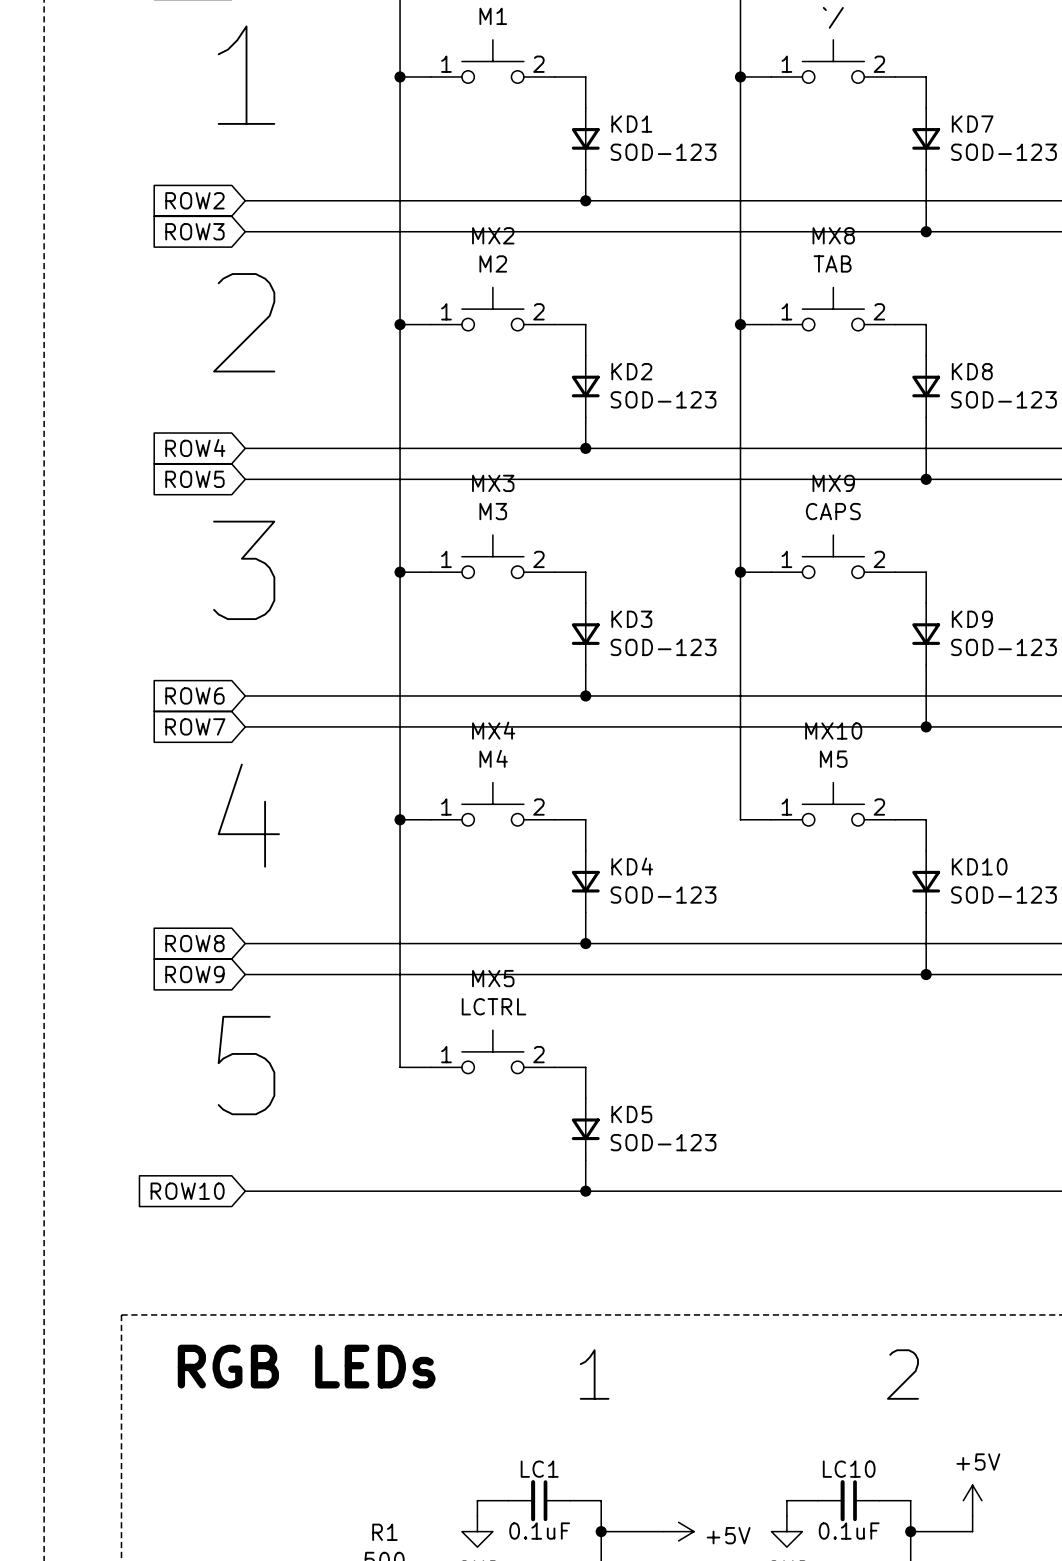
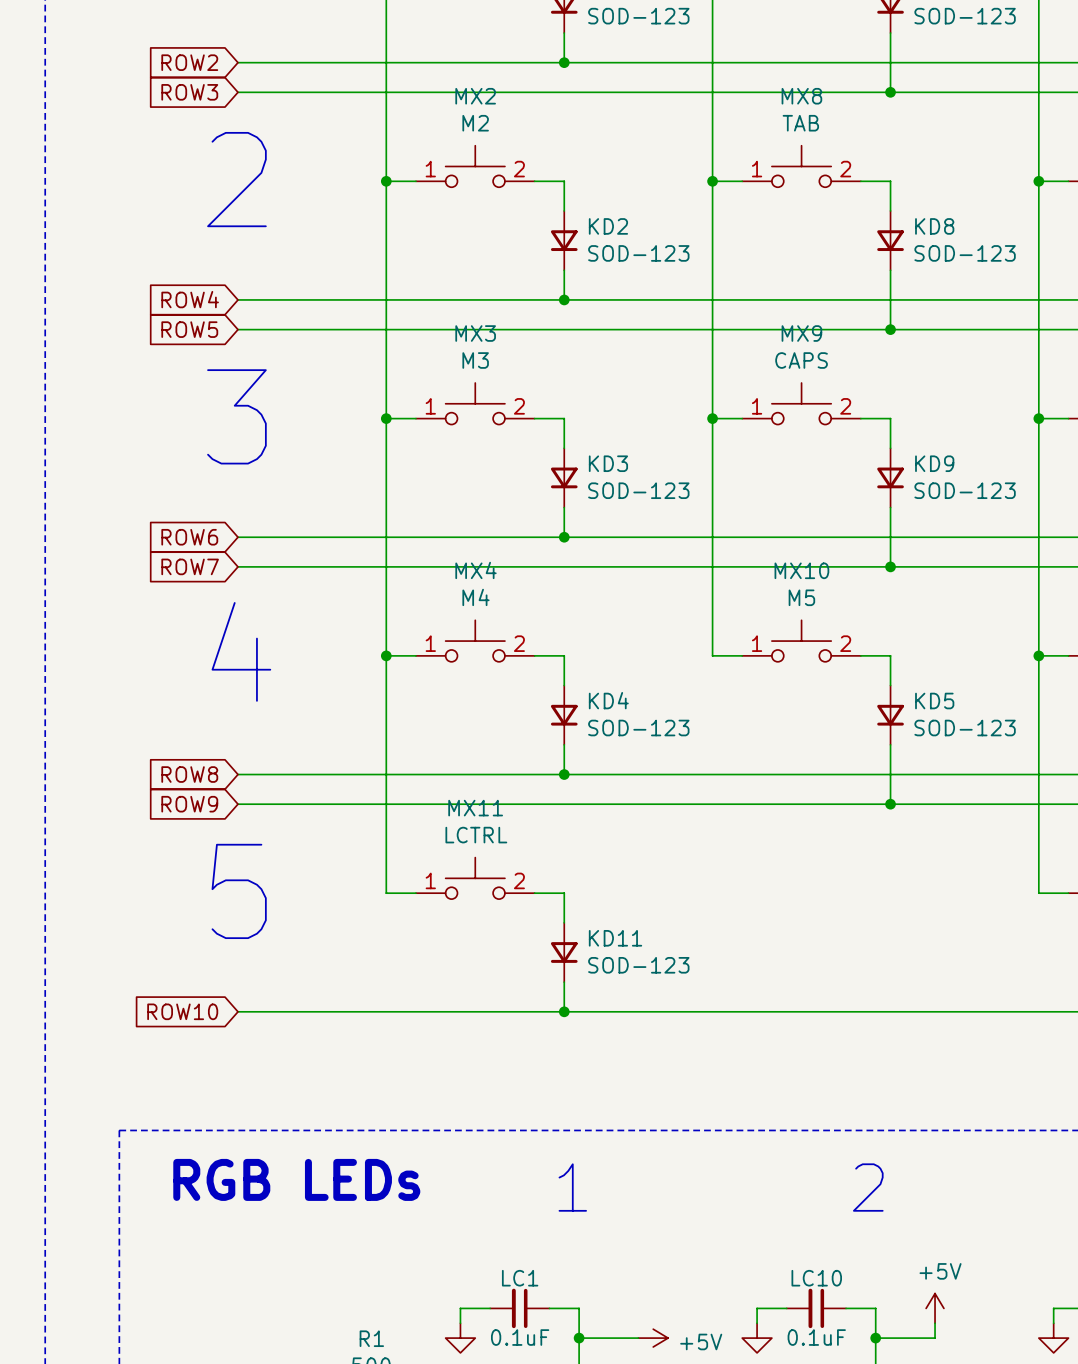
KD10 name: KD10 (979, 866) -> KD5 (934, 701)
MX5 name: MX5 (493, 978) -> MX11 (475, 808)
KD5 name: KD5 (631, 1114) -> KD11 (615, 938)

